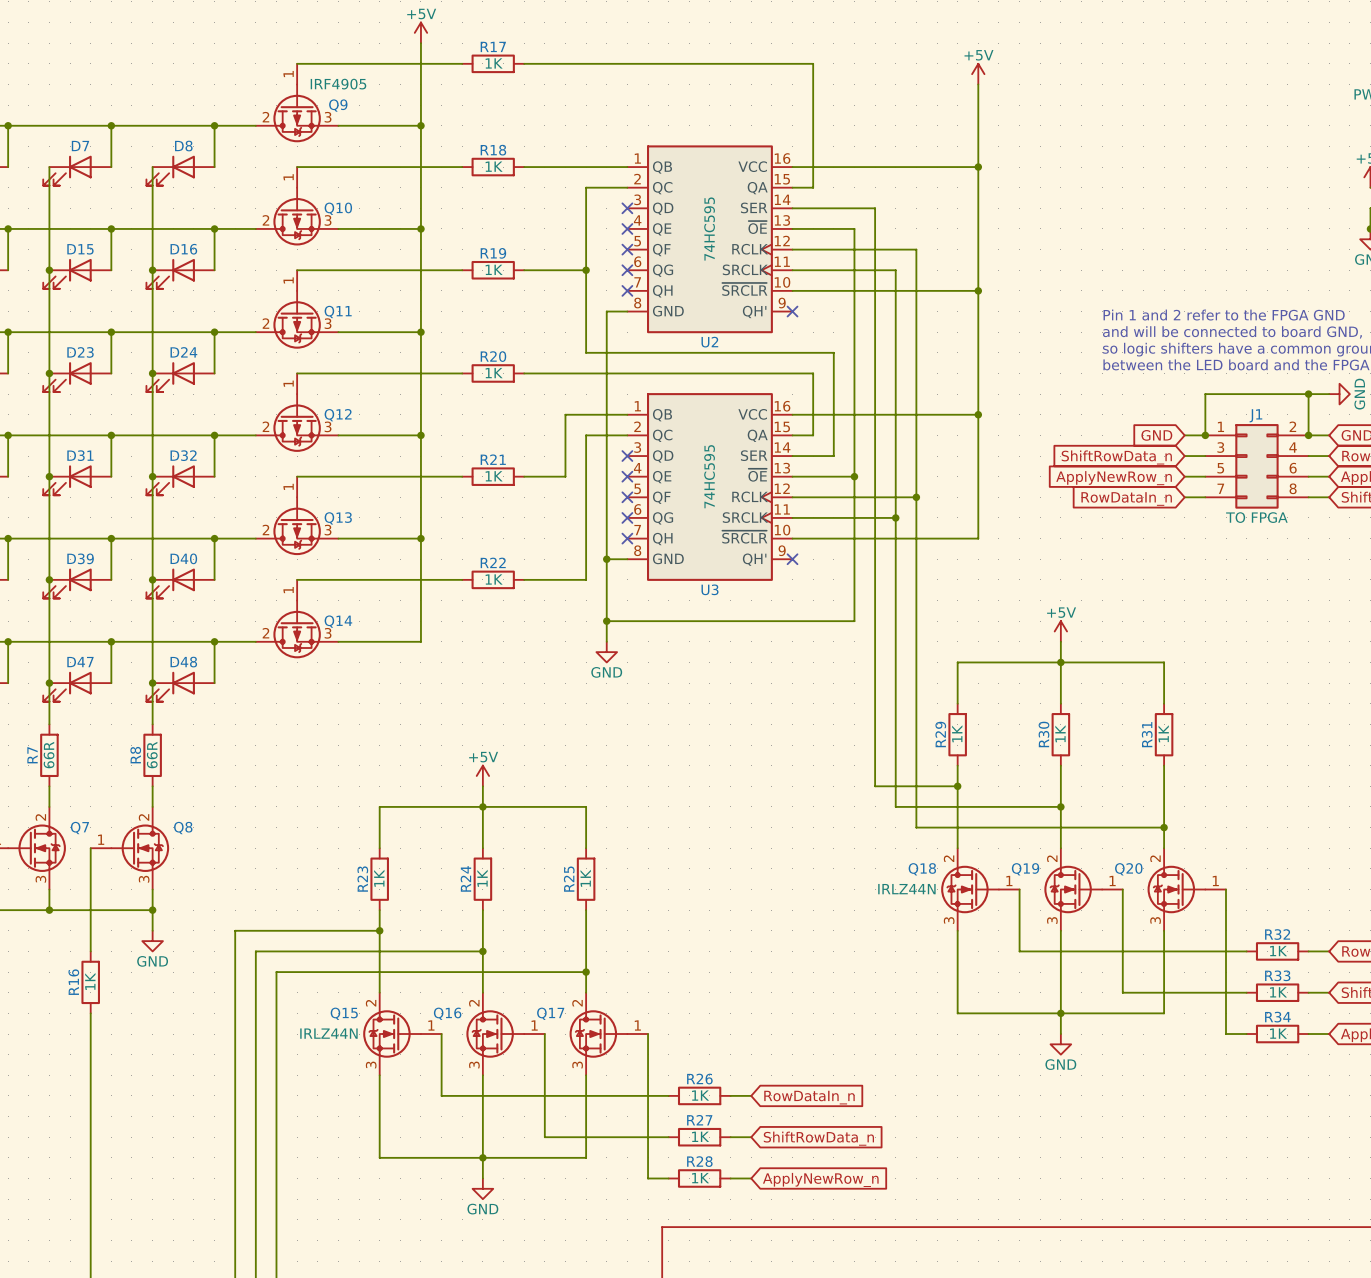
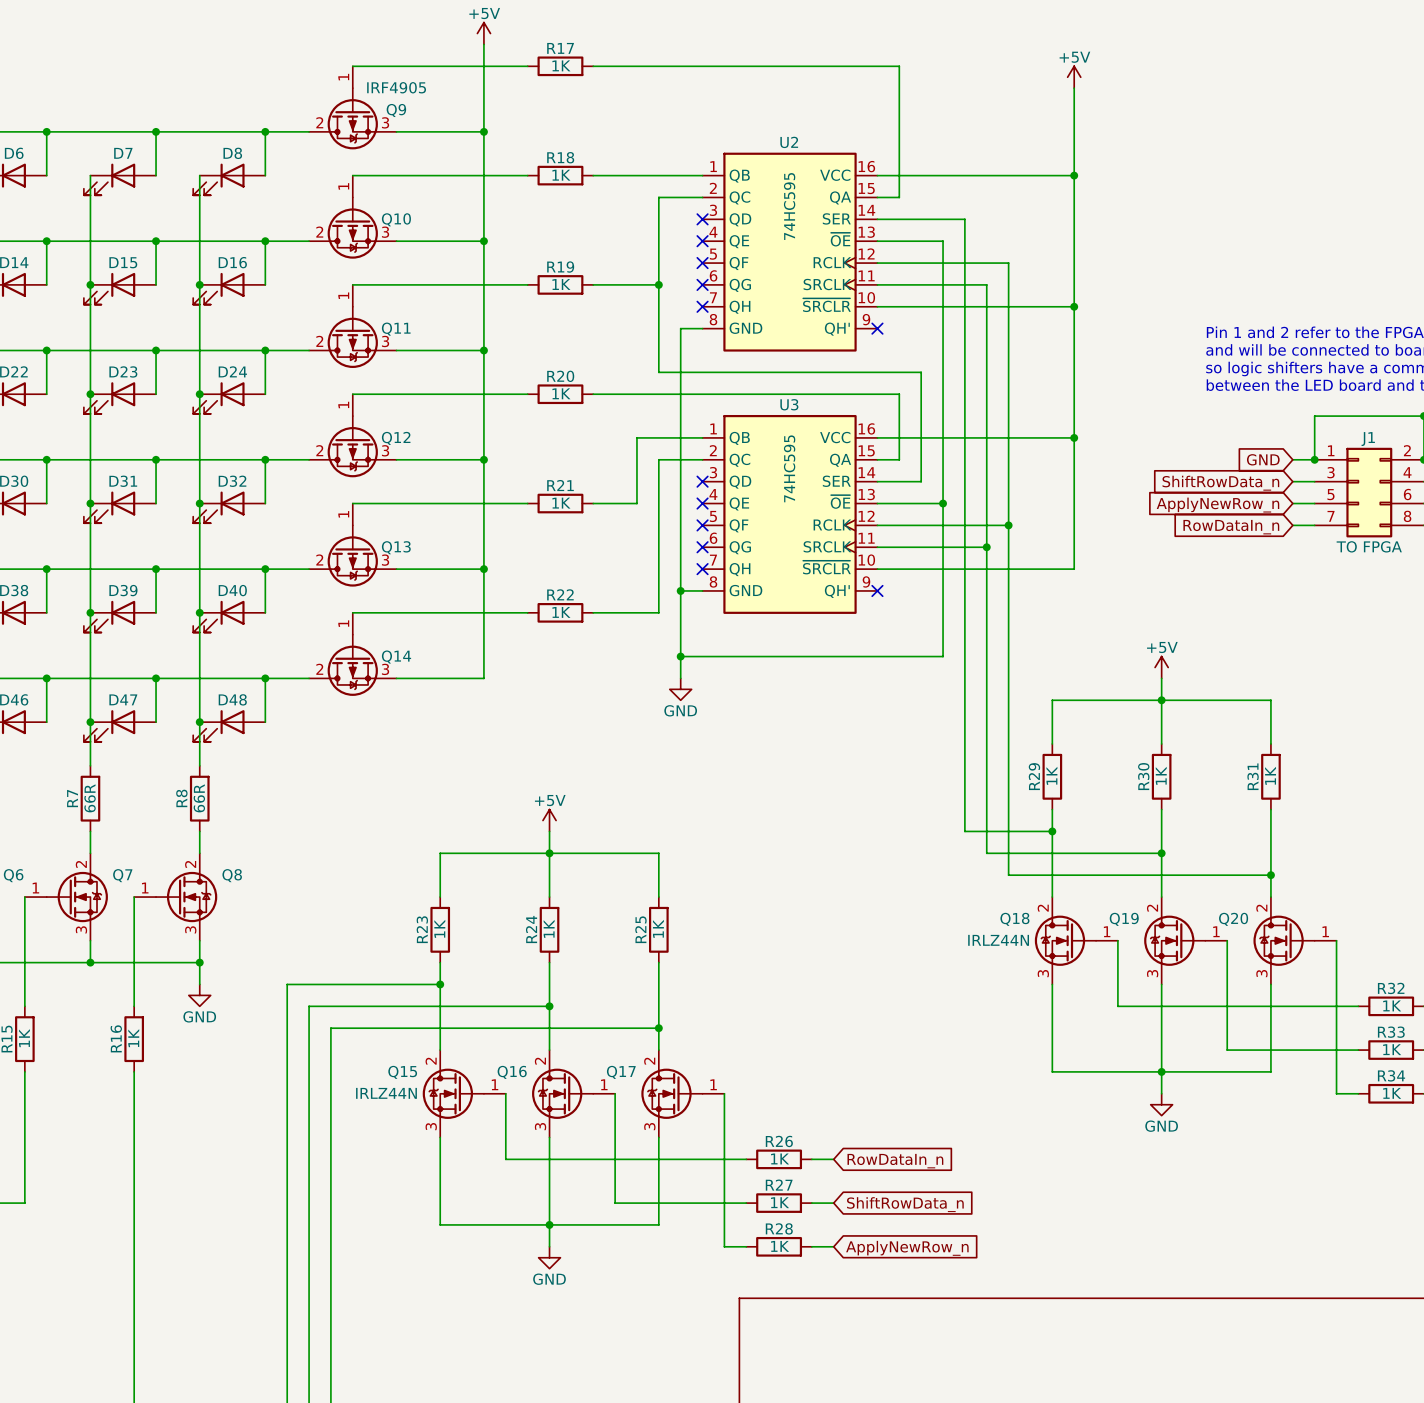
U2 value position: 74HC595 (709, 229) -> 74HC595 (789, 206)
U2 name position: U2 (709, 342) -> U2 (789, 142)
U3 value position: 74HC595 (709, 476) -> 74HC595 (789, 468)
U3 name position: U3 (710, 589) -> U3 (789, 404)

